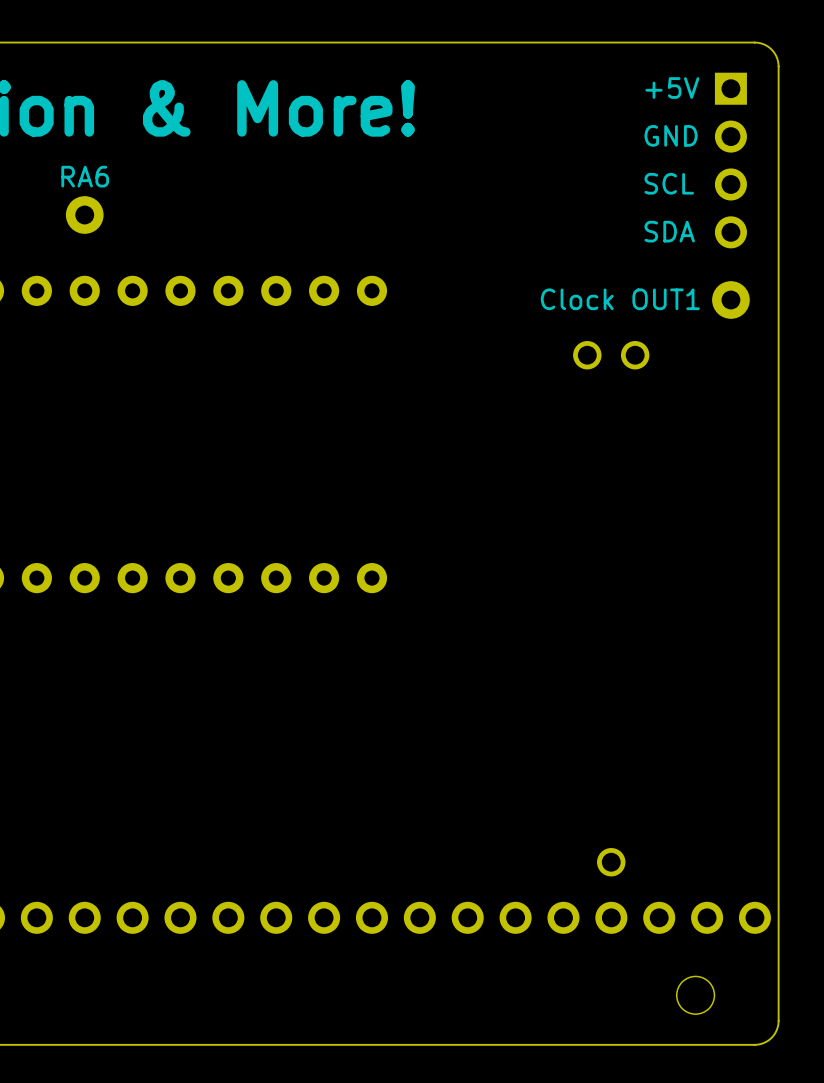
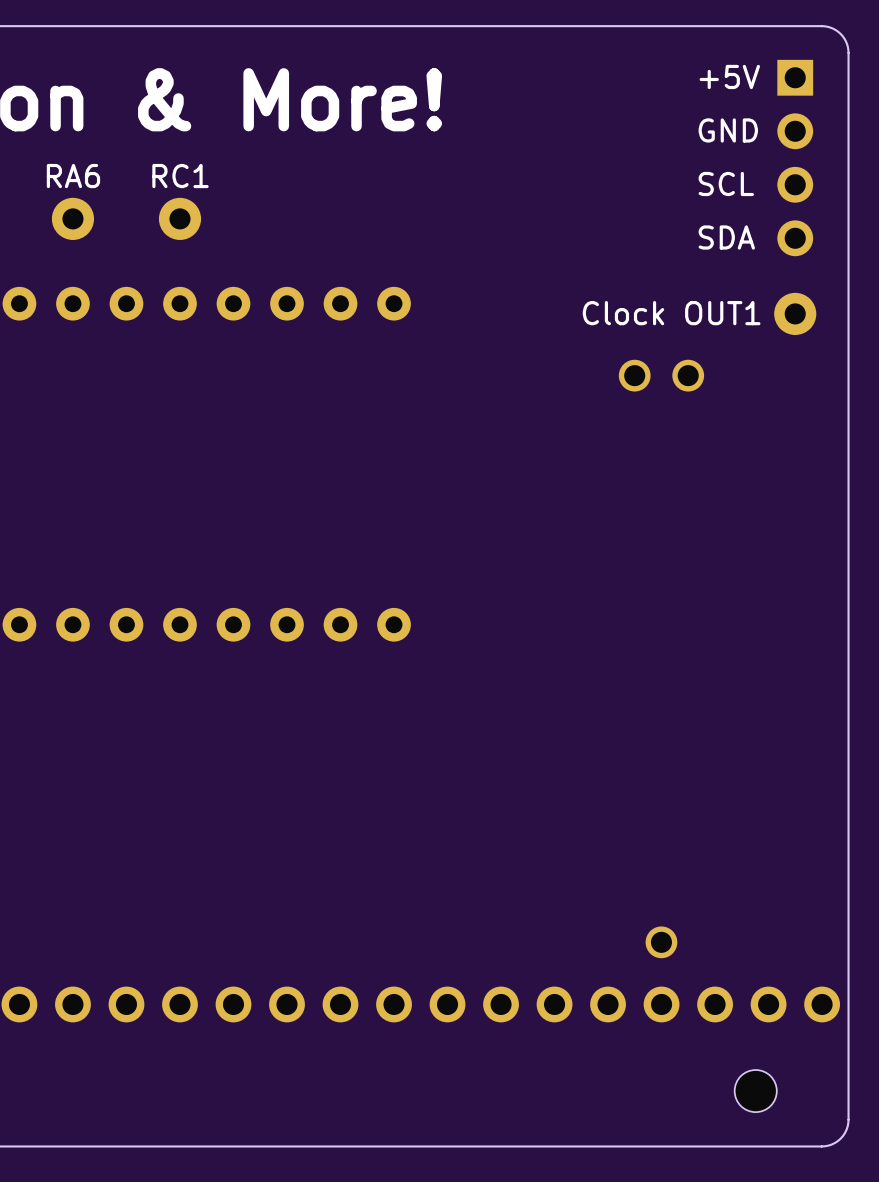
RC1: none -> (179, 218)

